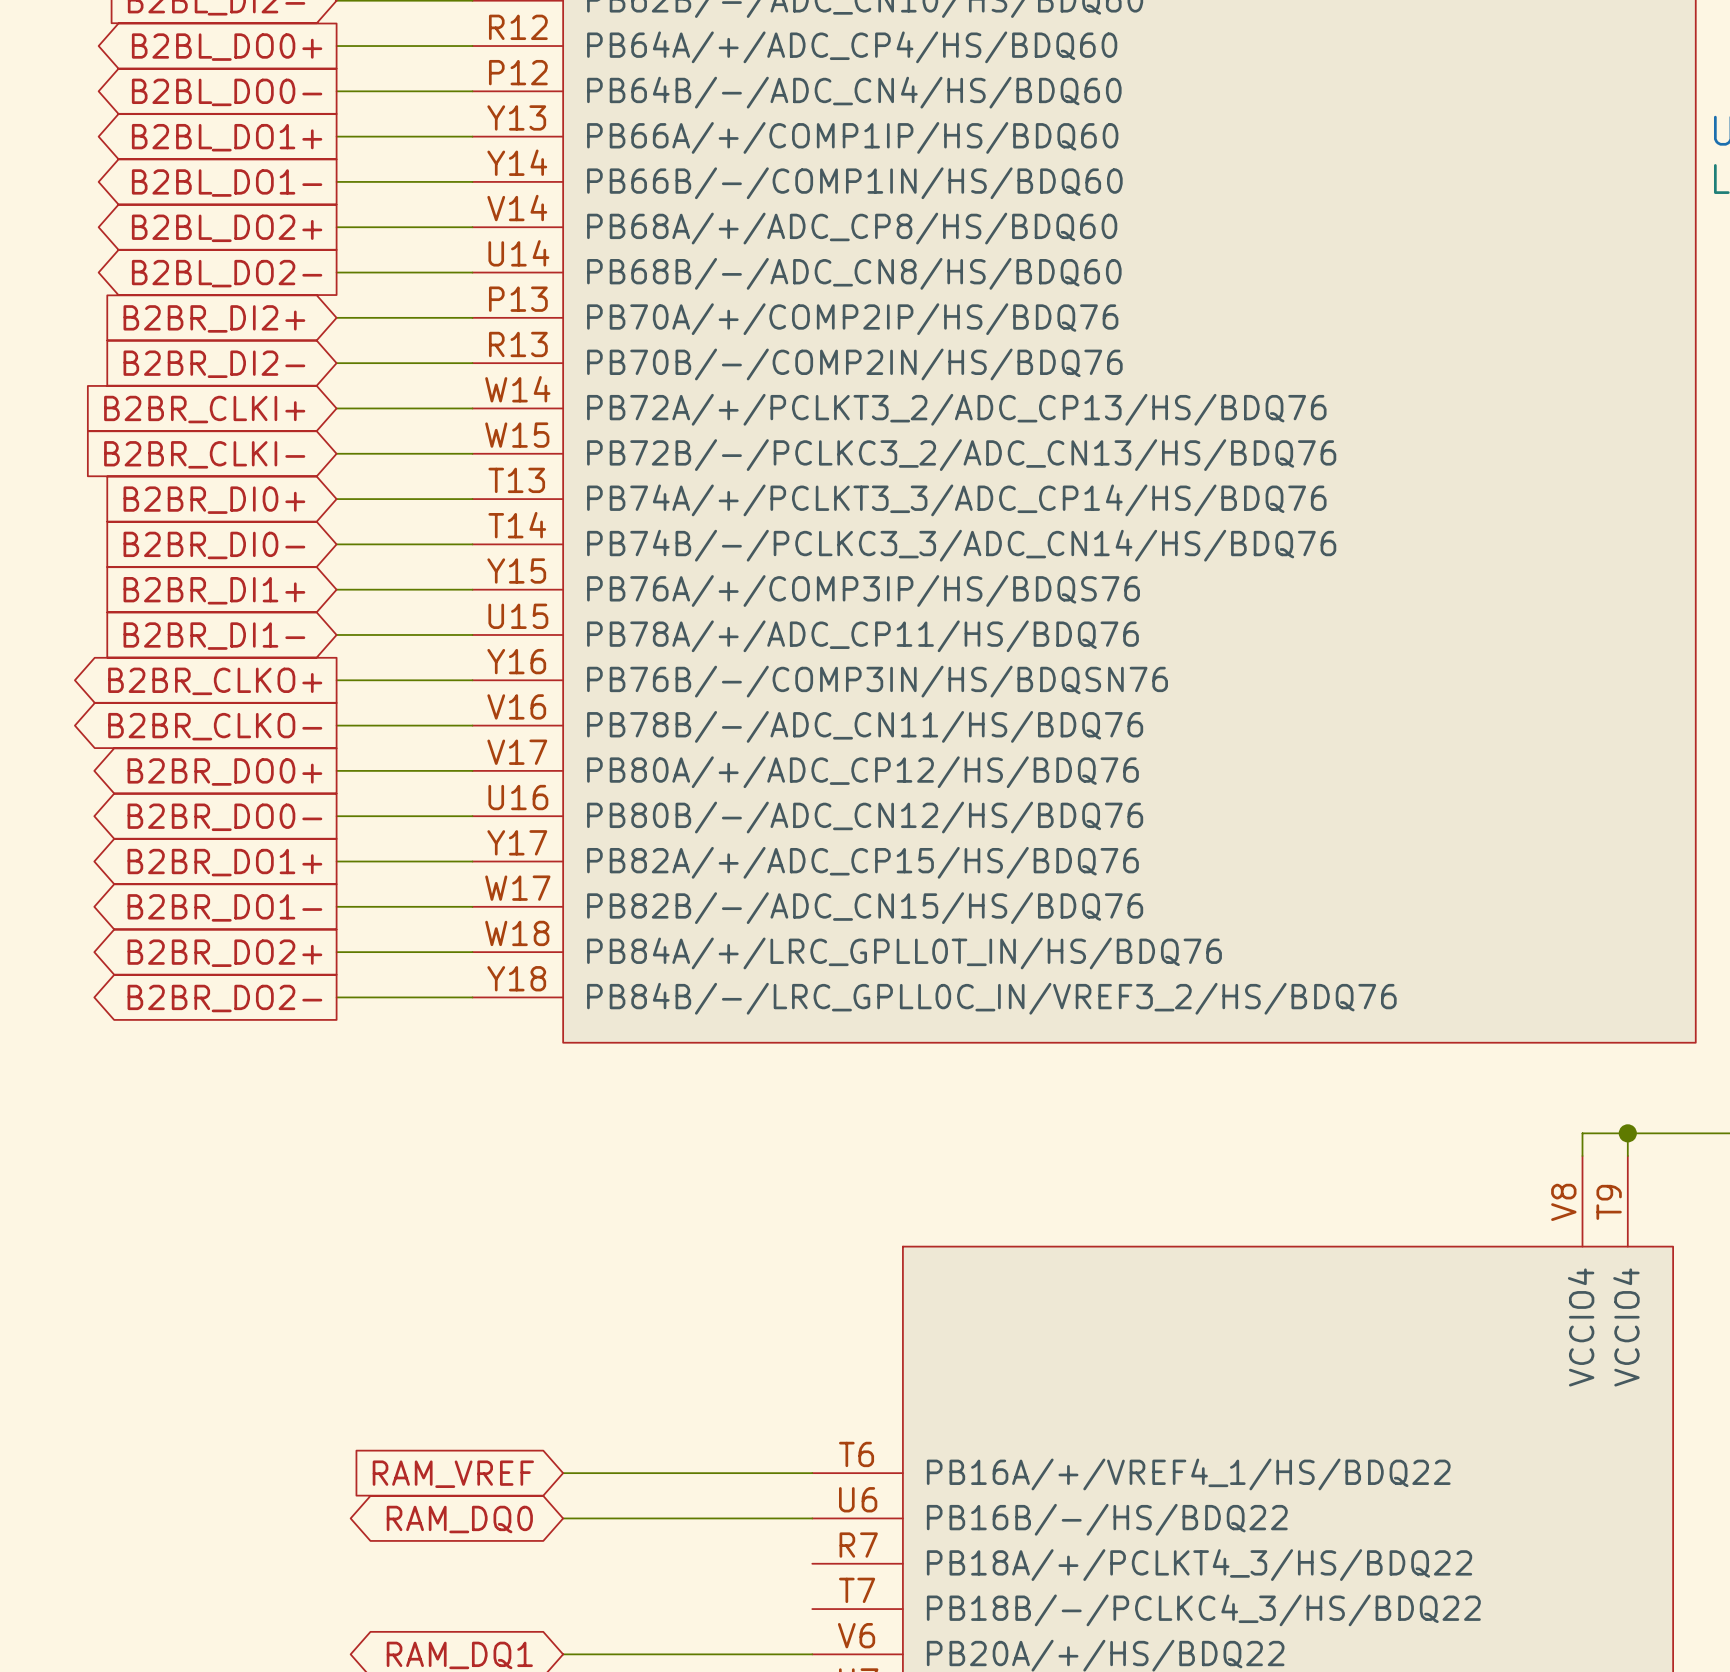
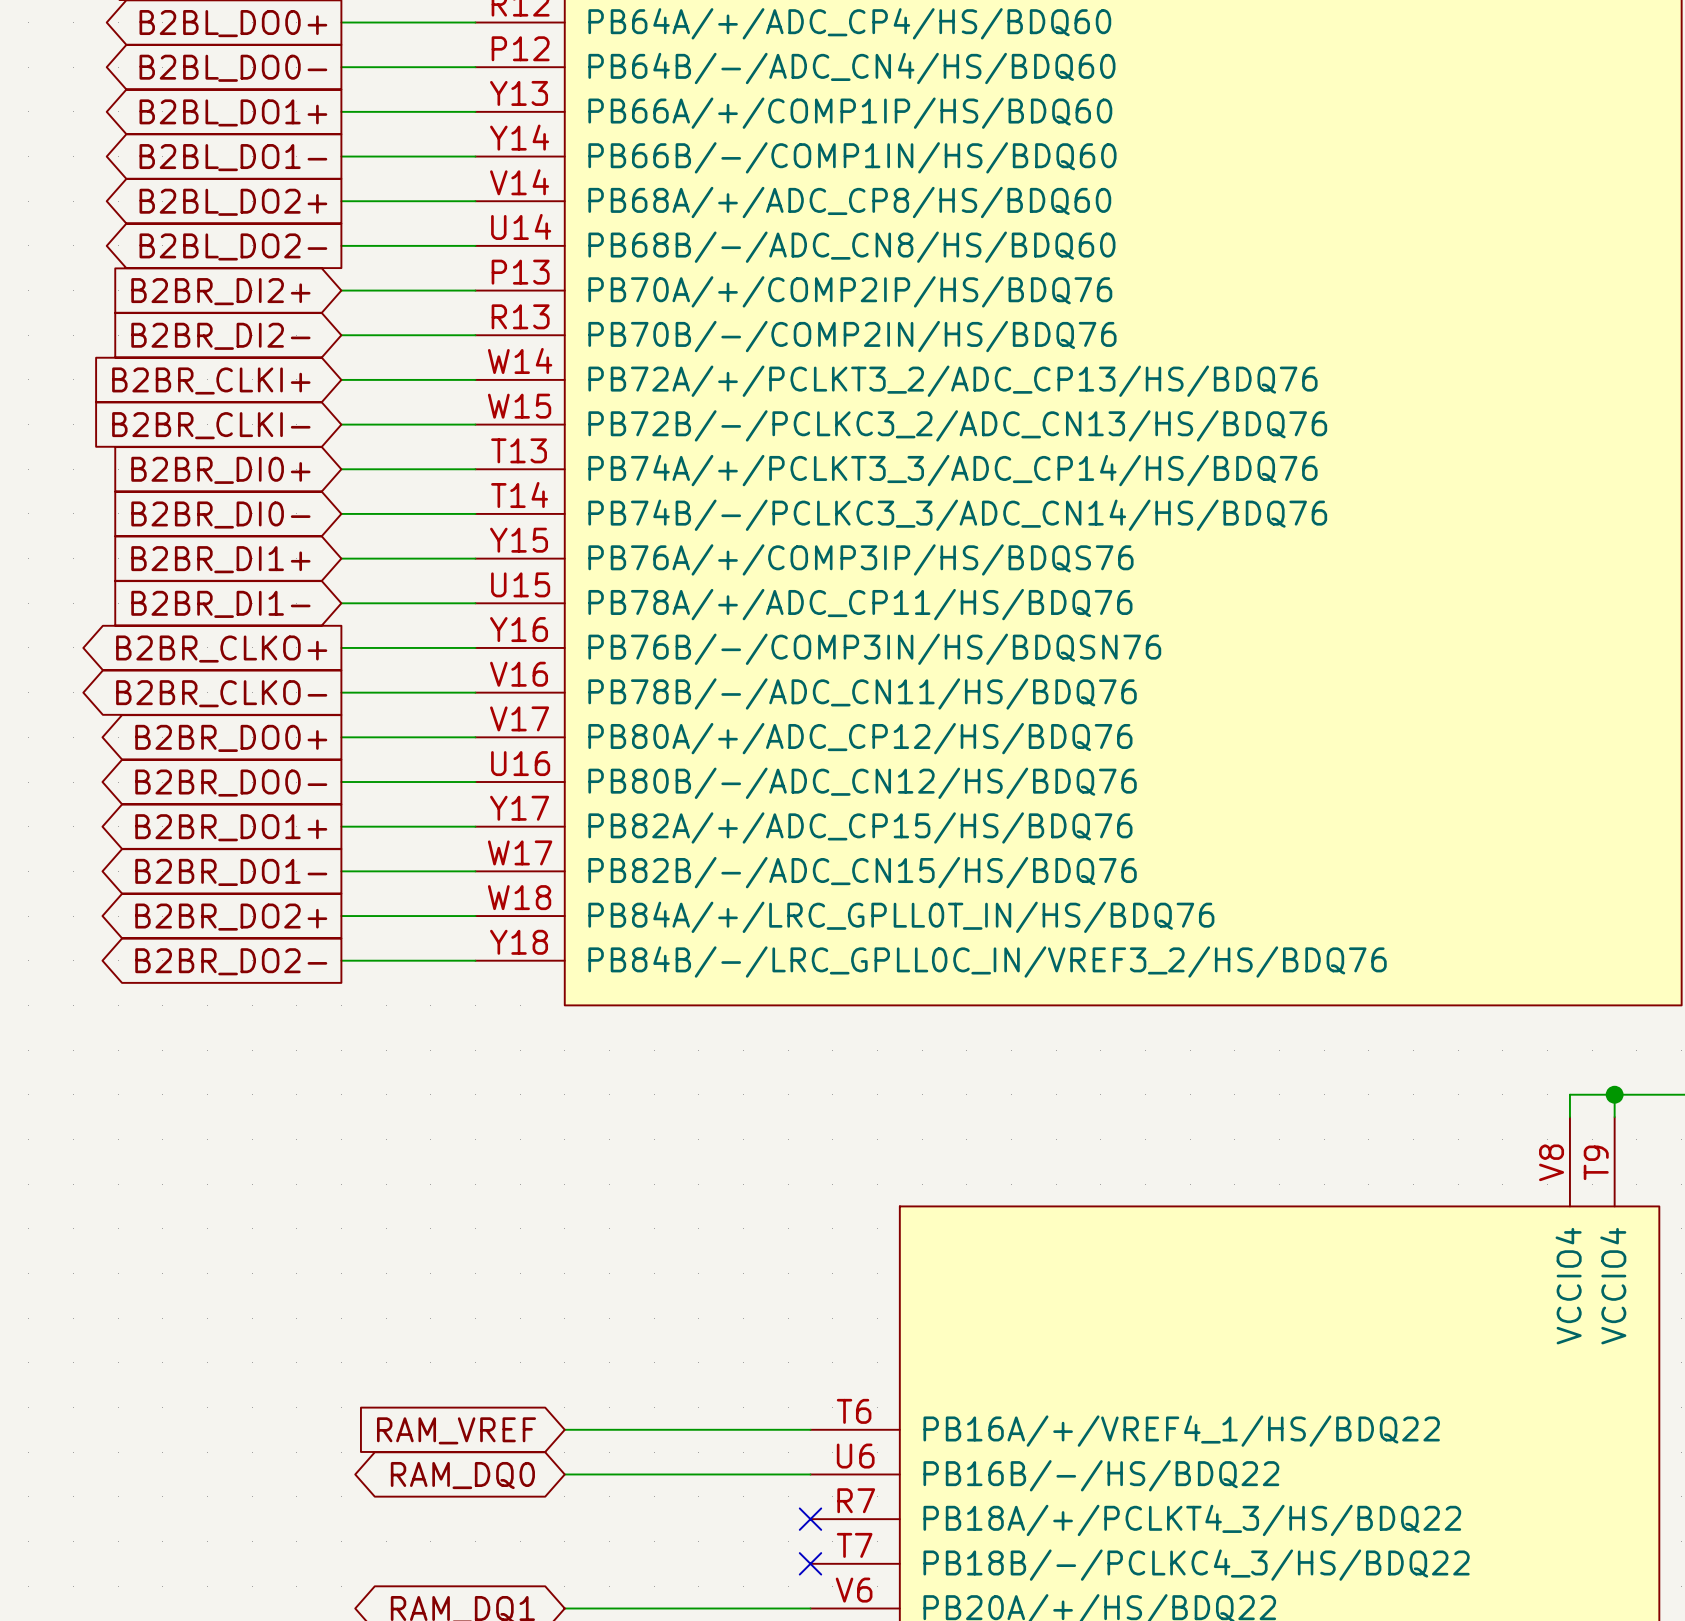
no-connect mark: none -> (810, 1519)
no-connect mark: none -> (810, 1563)

